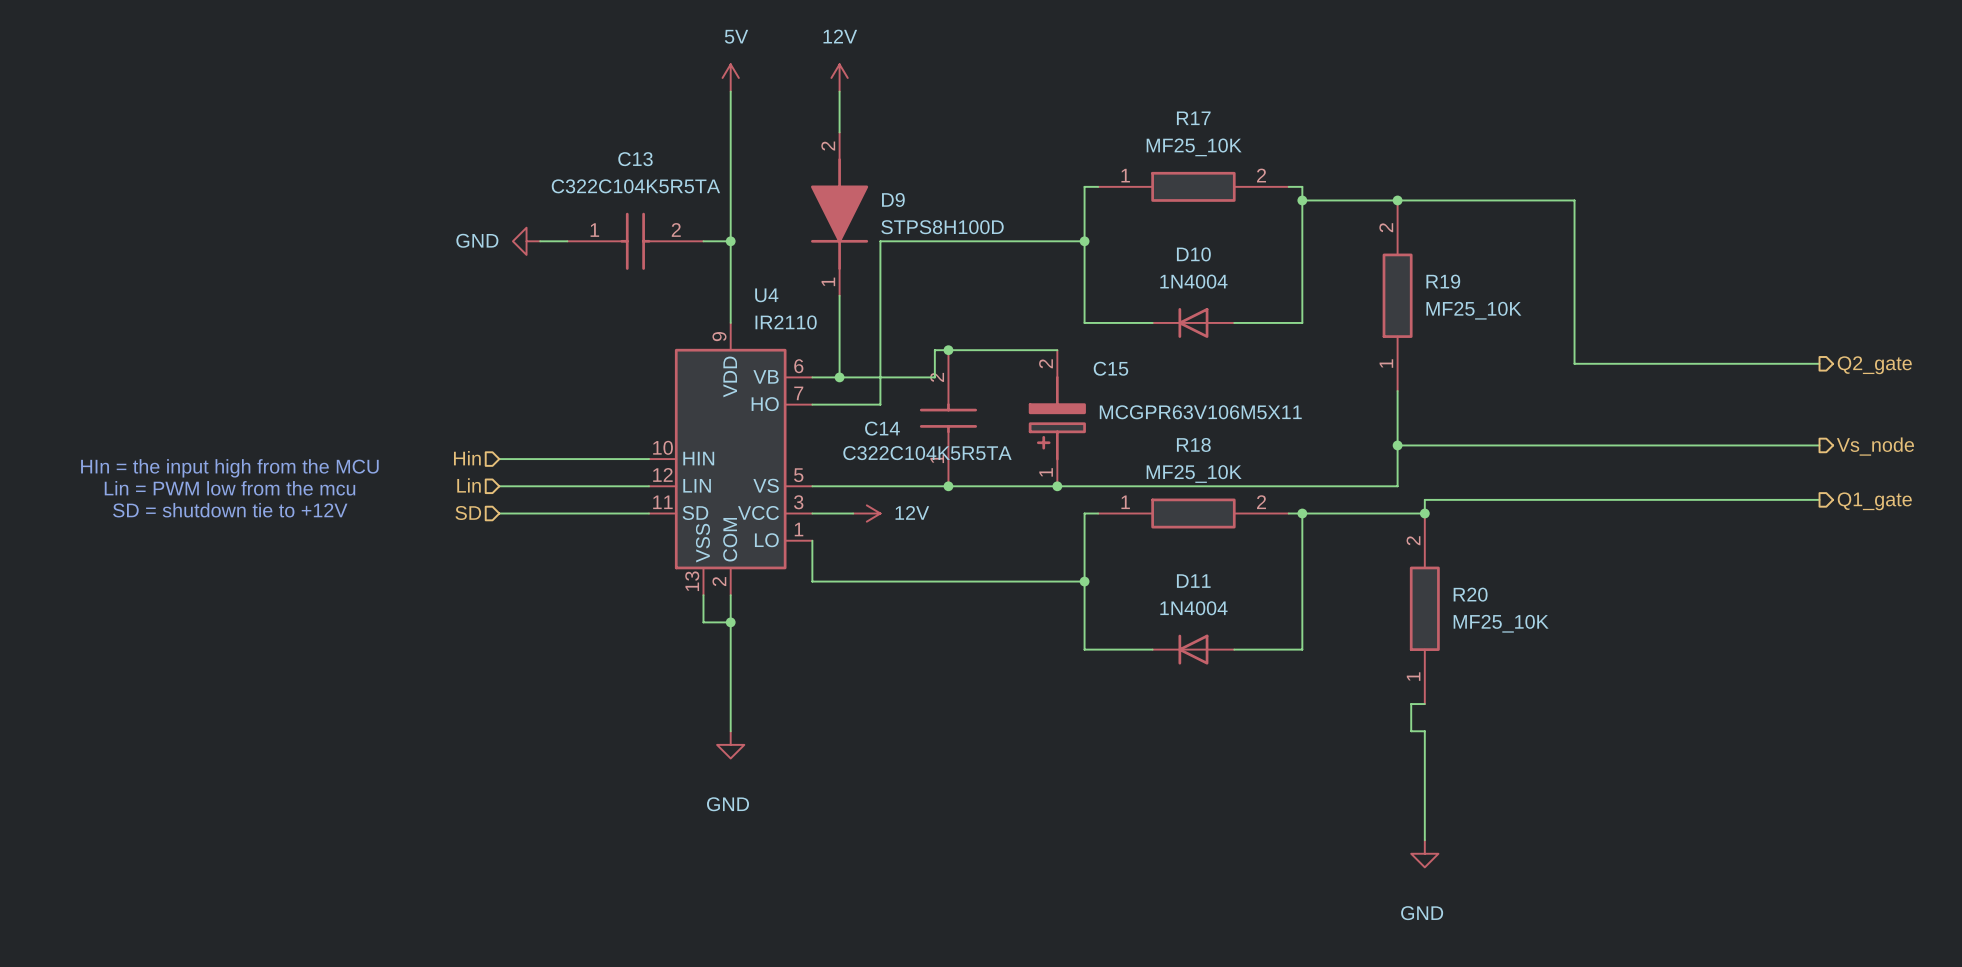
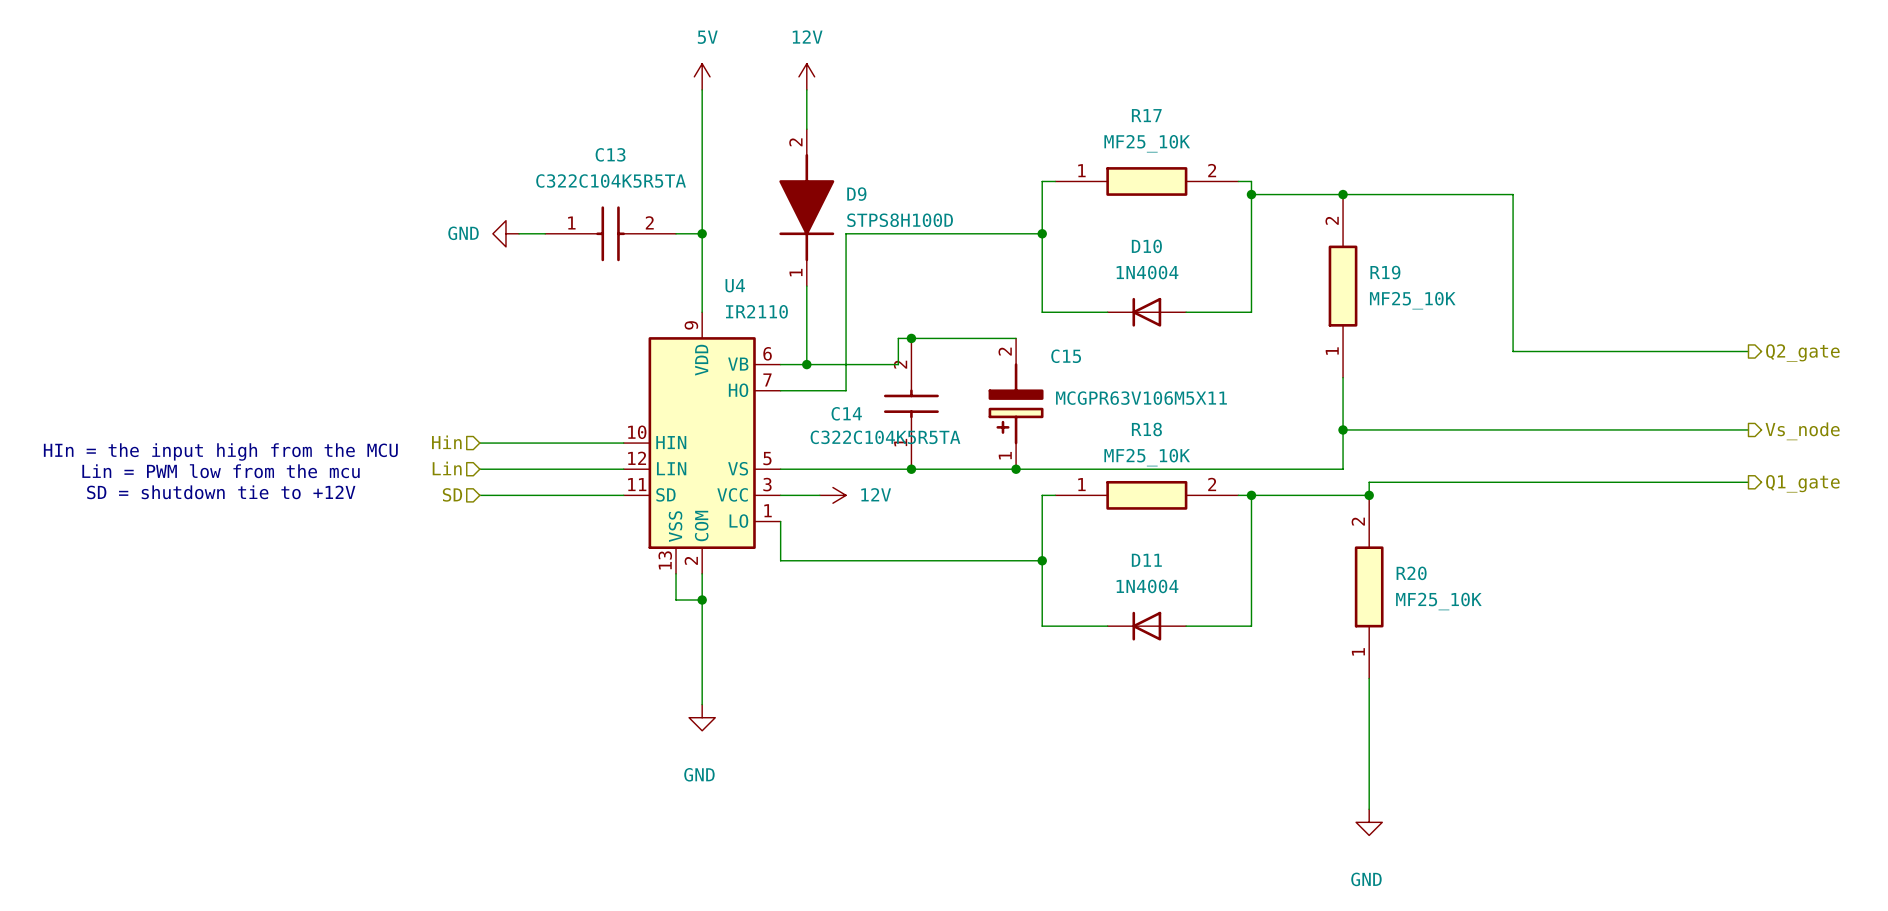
wire: (1424, 704) (1411, 704) (1411, 731) (1424, 731) -> (1369, 678) (1369, 704)

